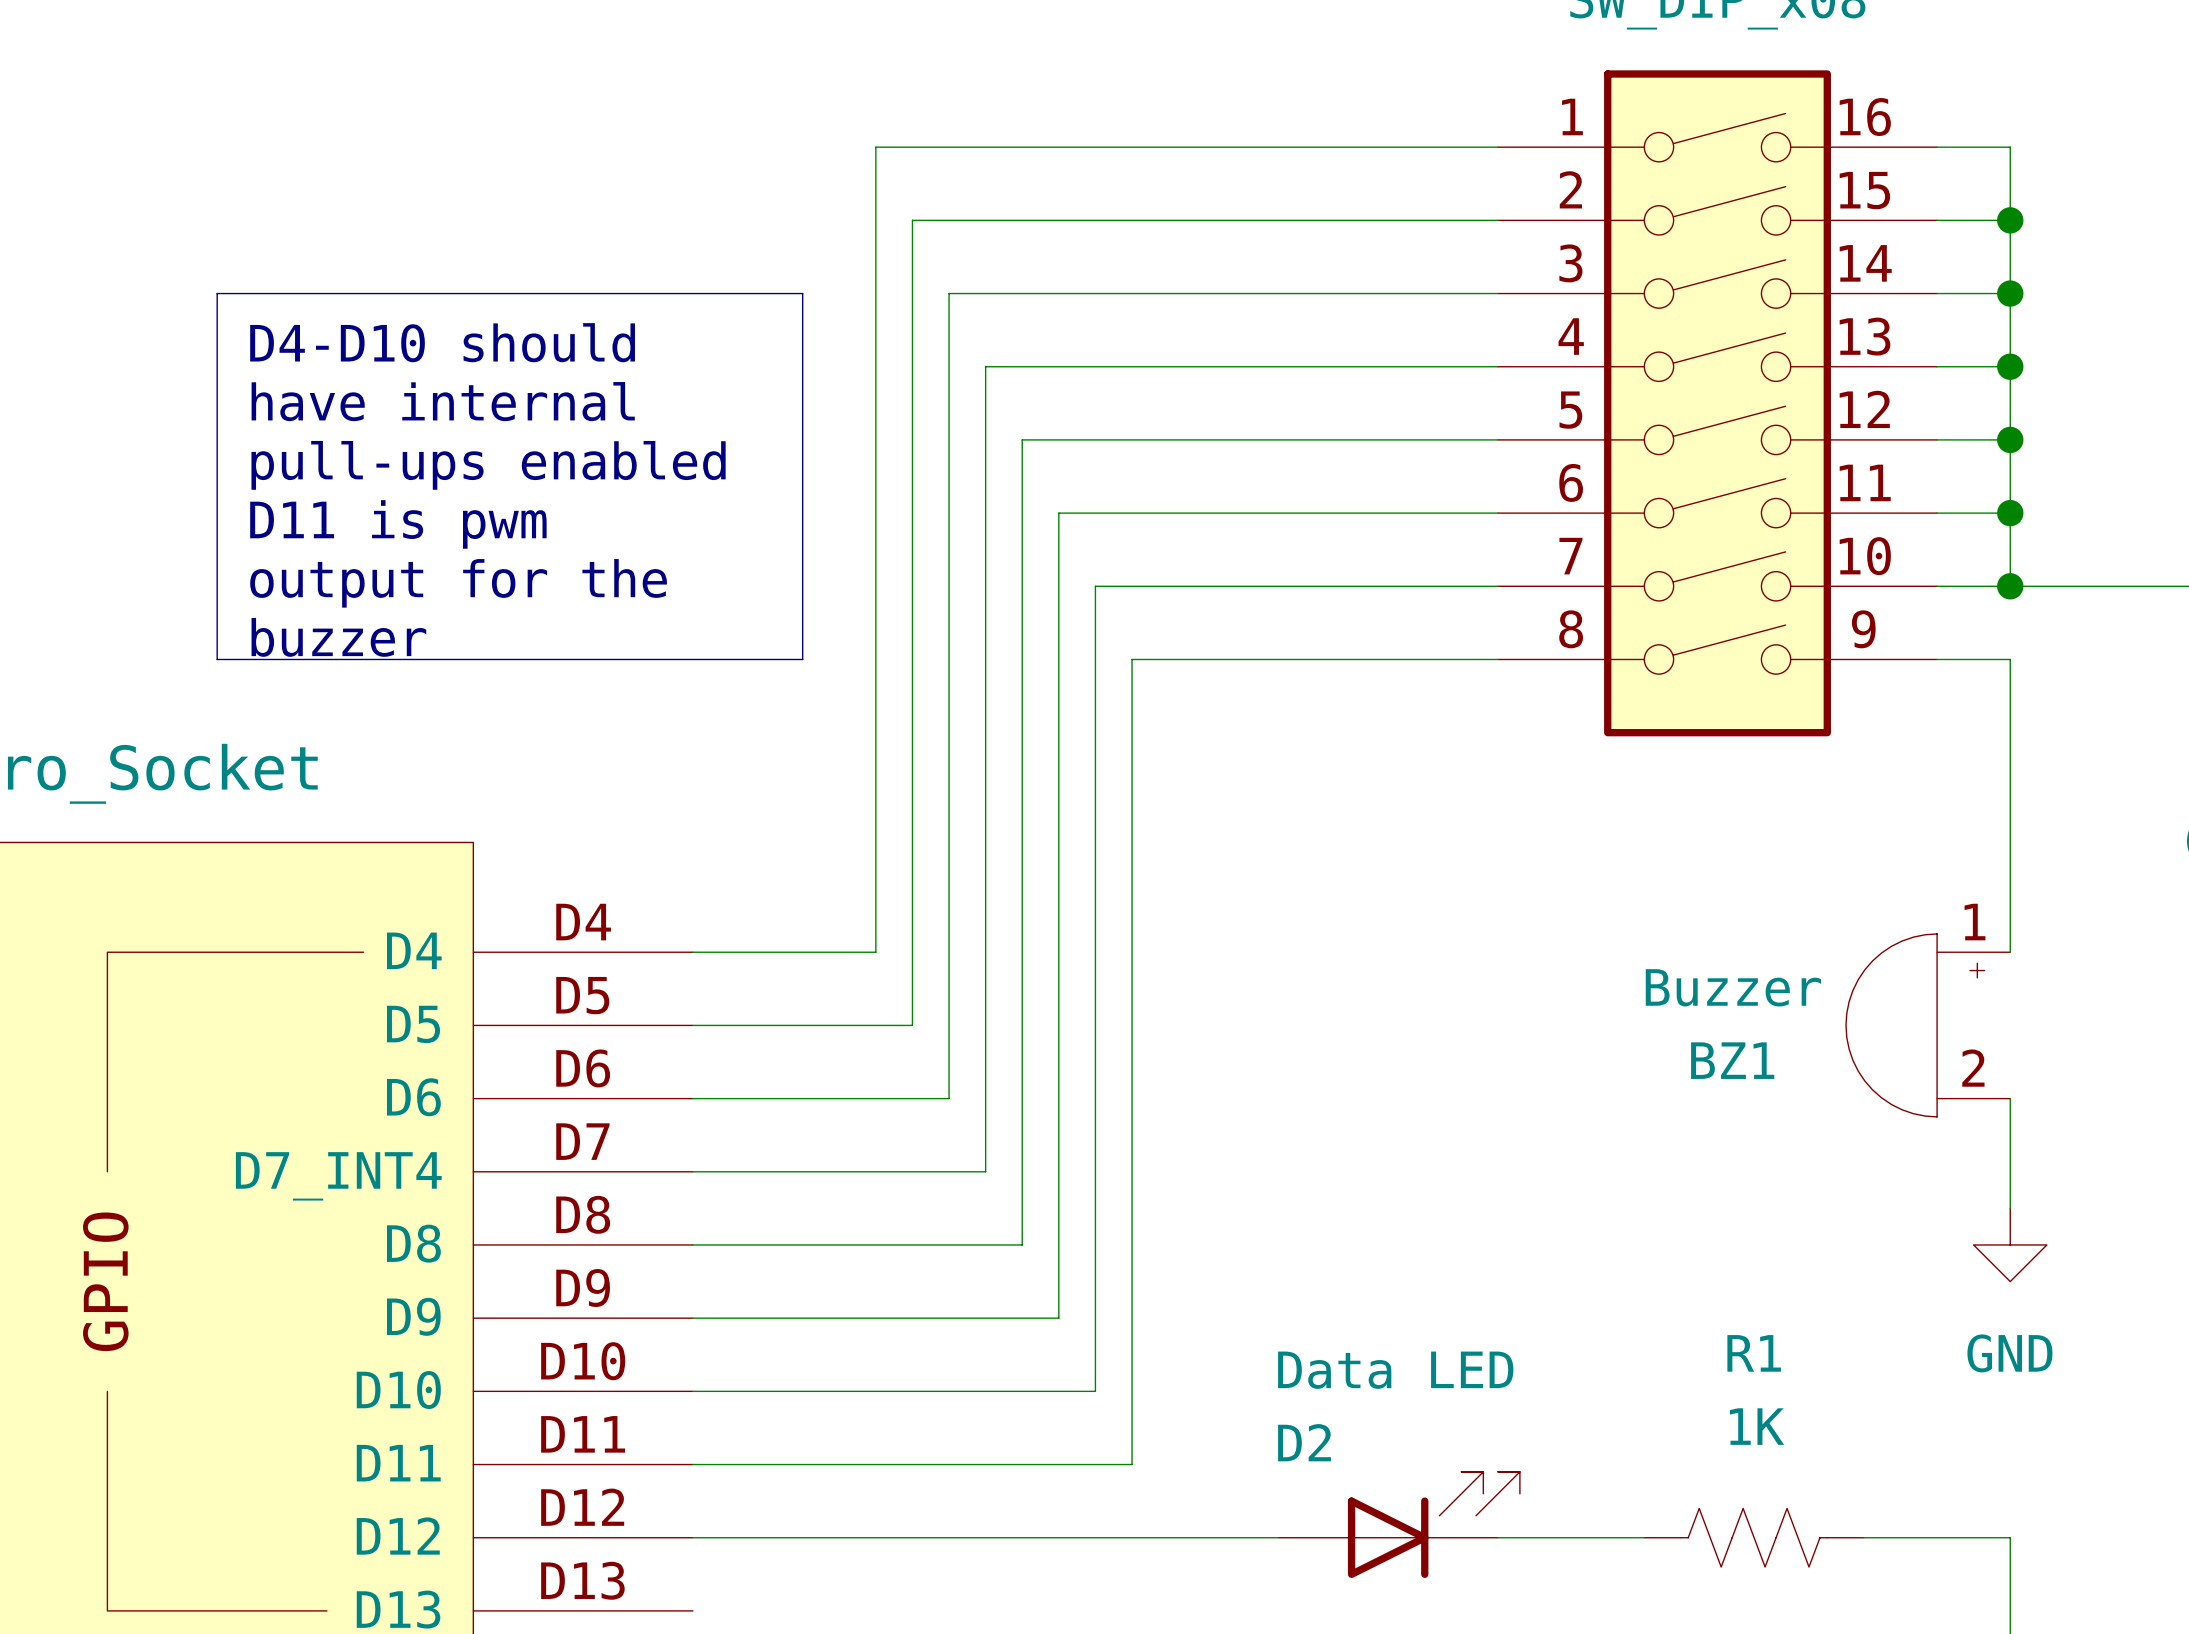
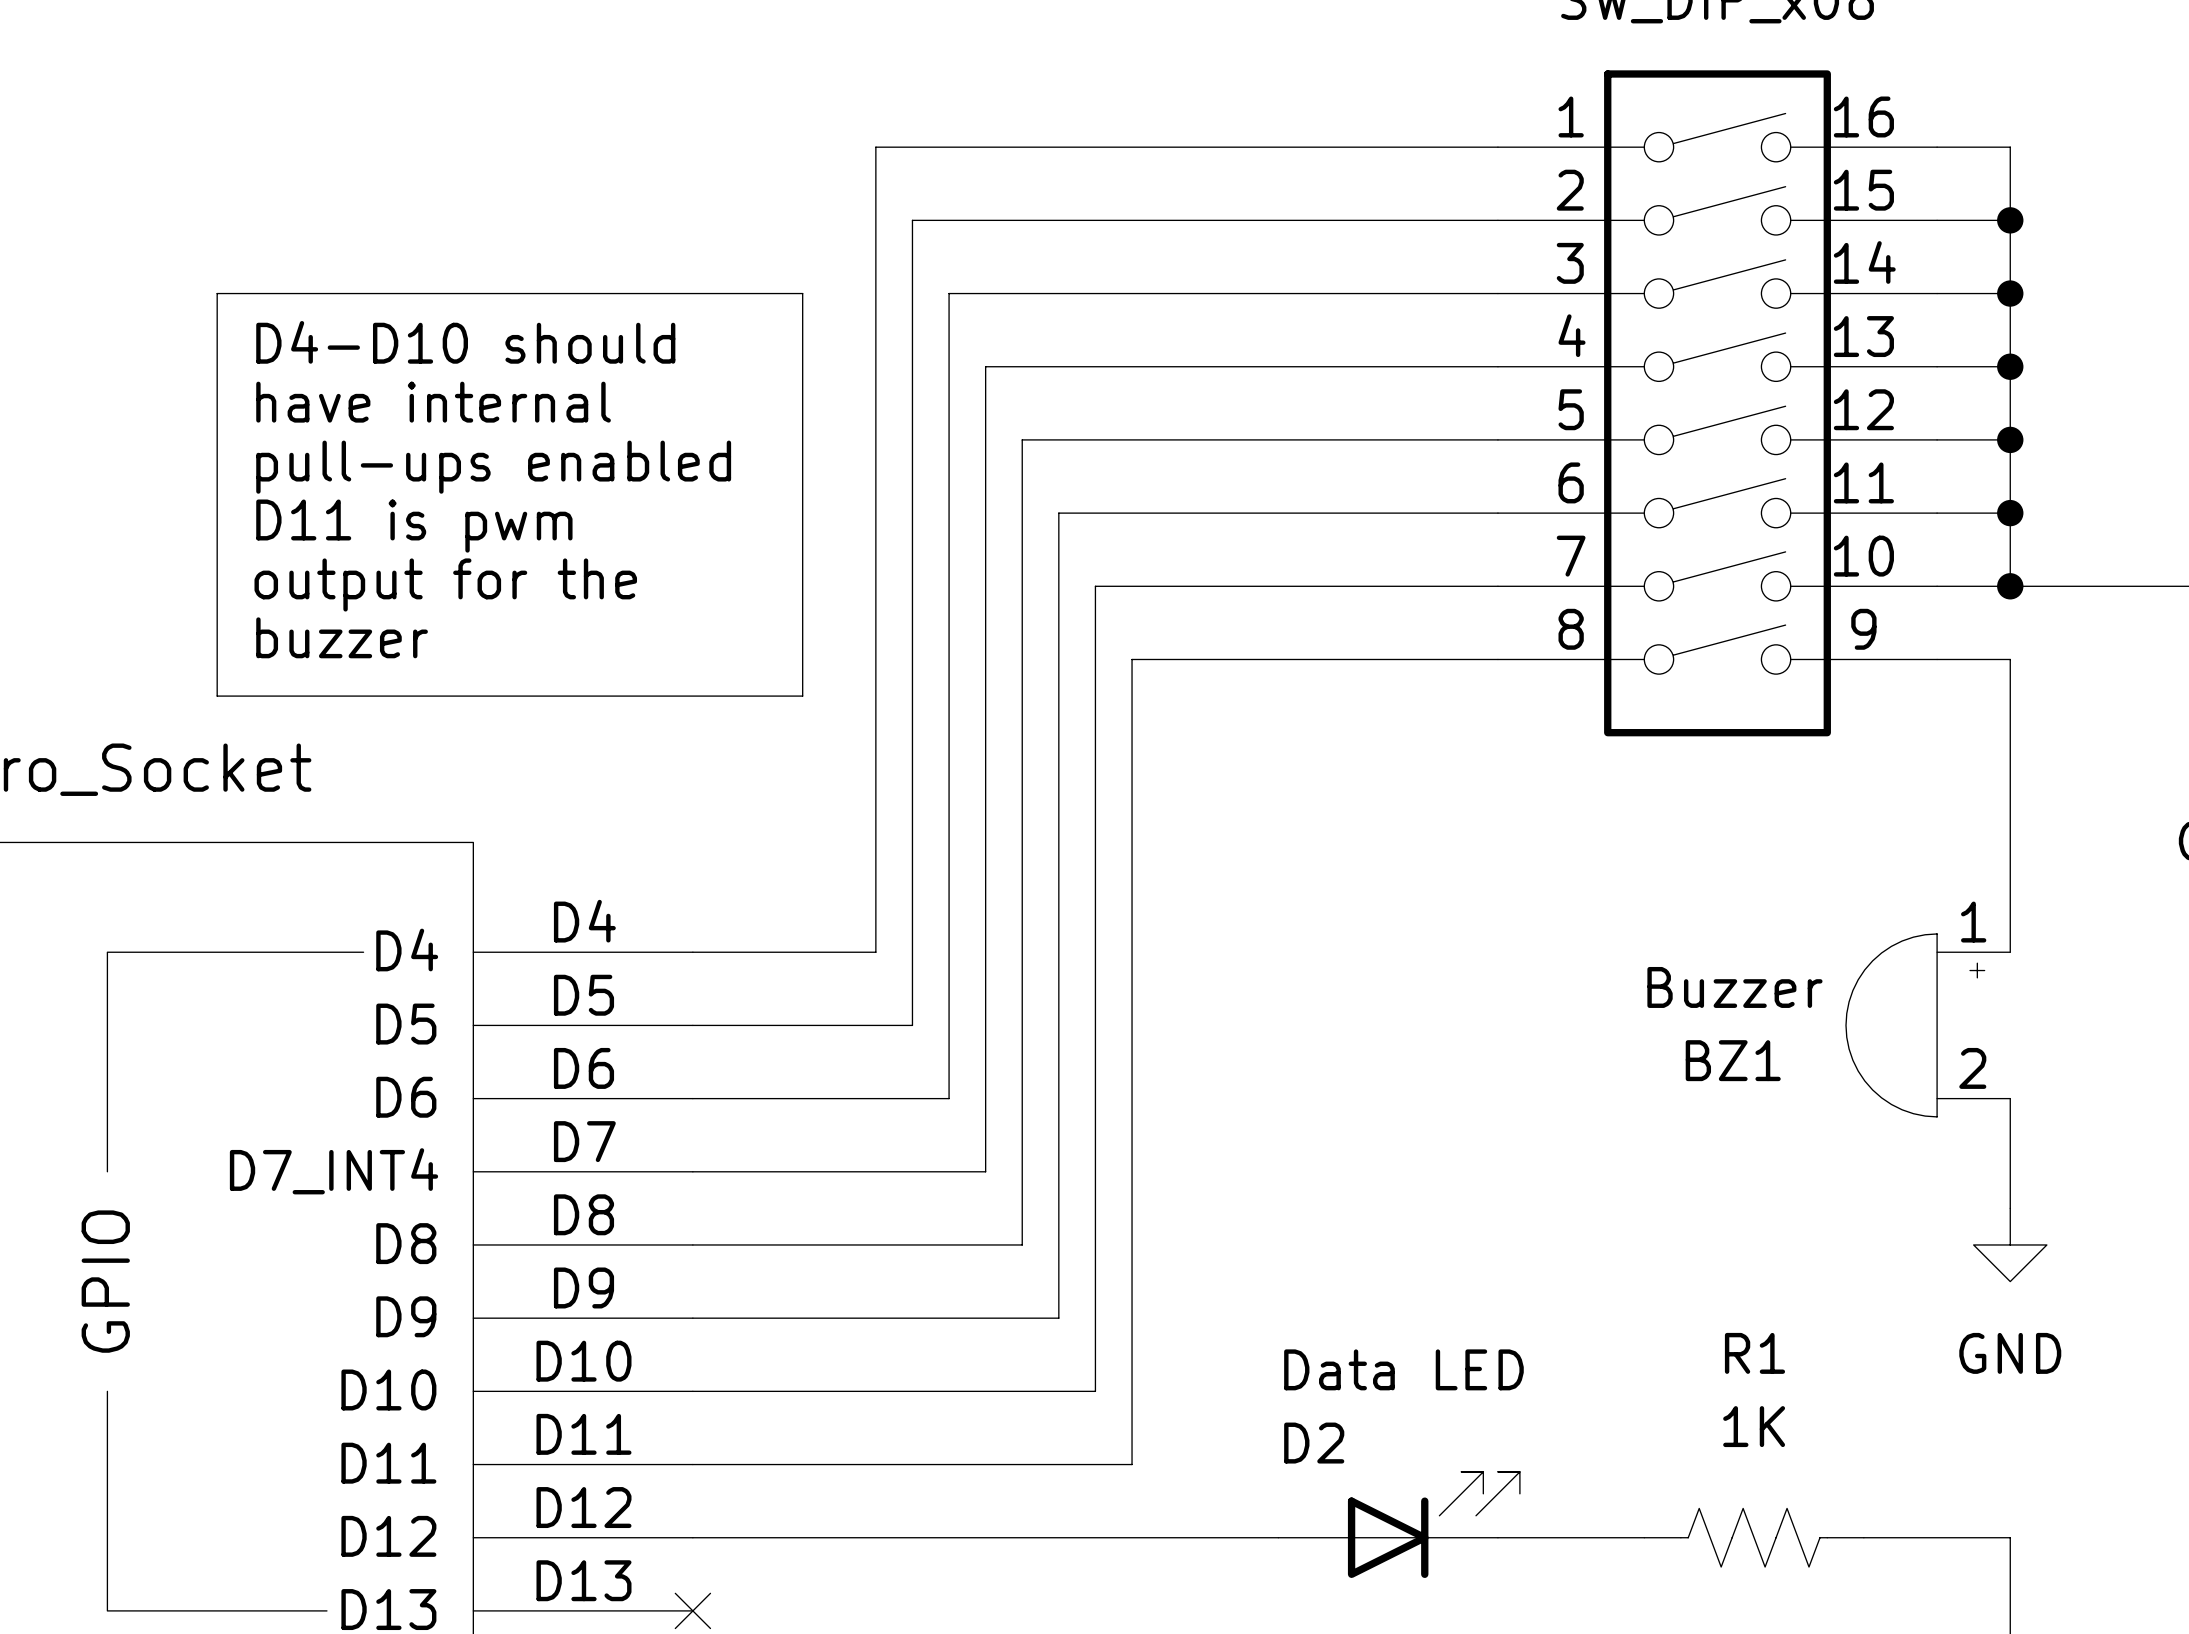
line: (217, 659) (802, 659) -> (217, 659) (217, 696) (802, 696) (802, 659)
no-connect mark: none -> (692, 1610)

